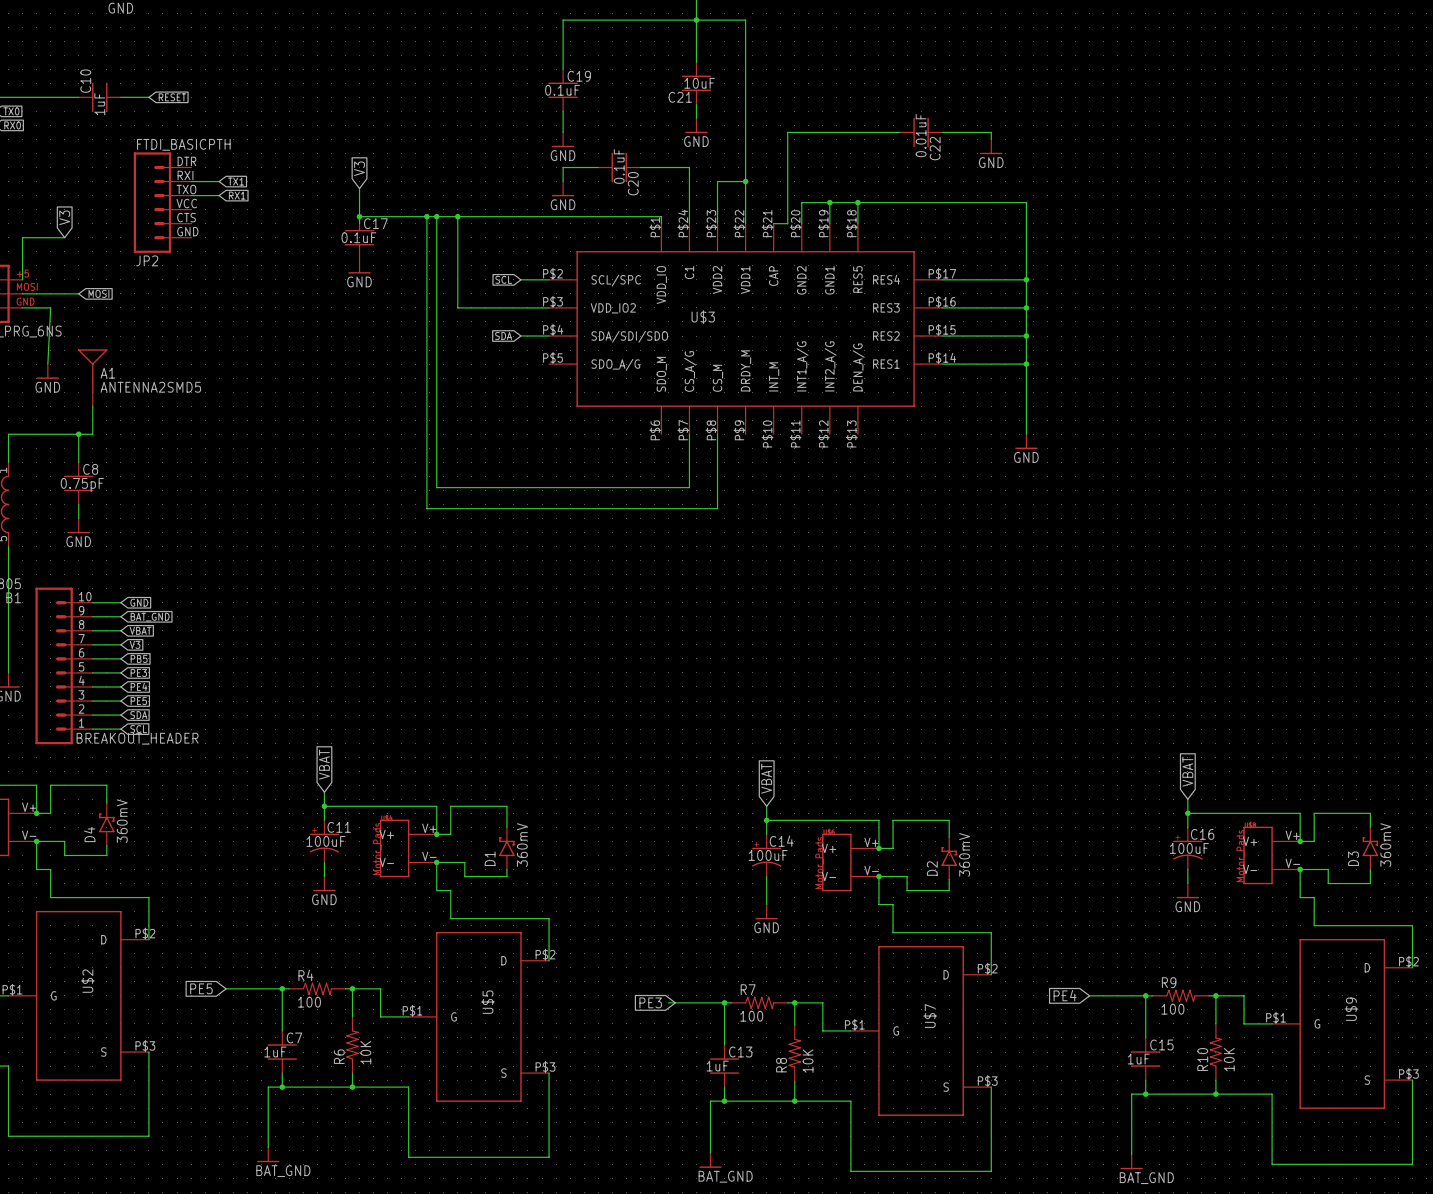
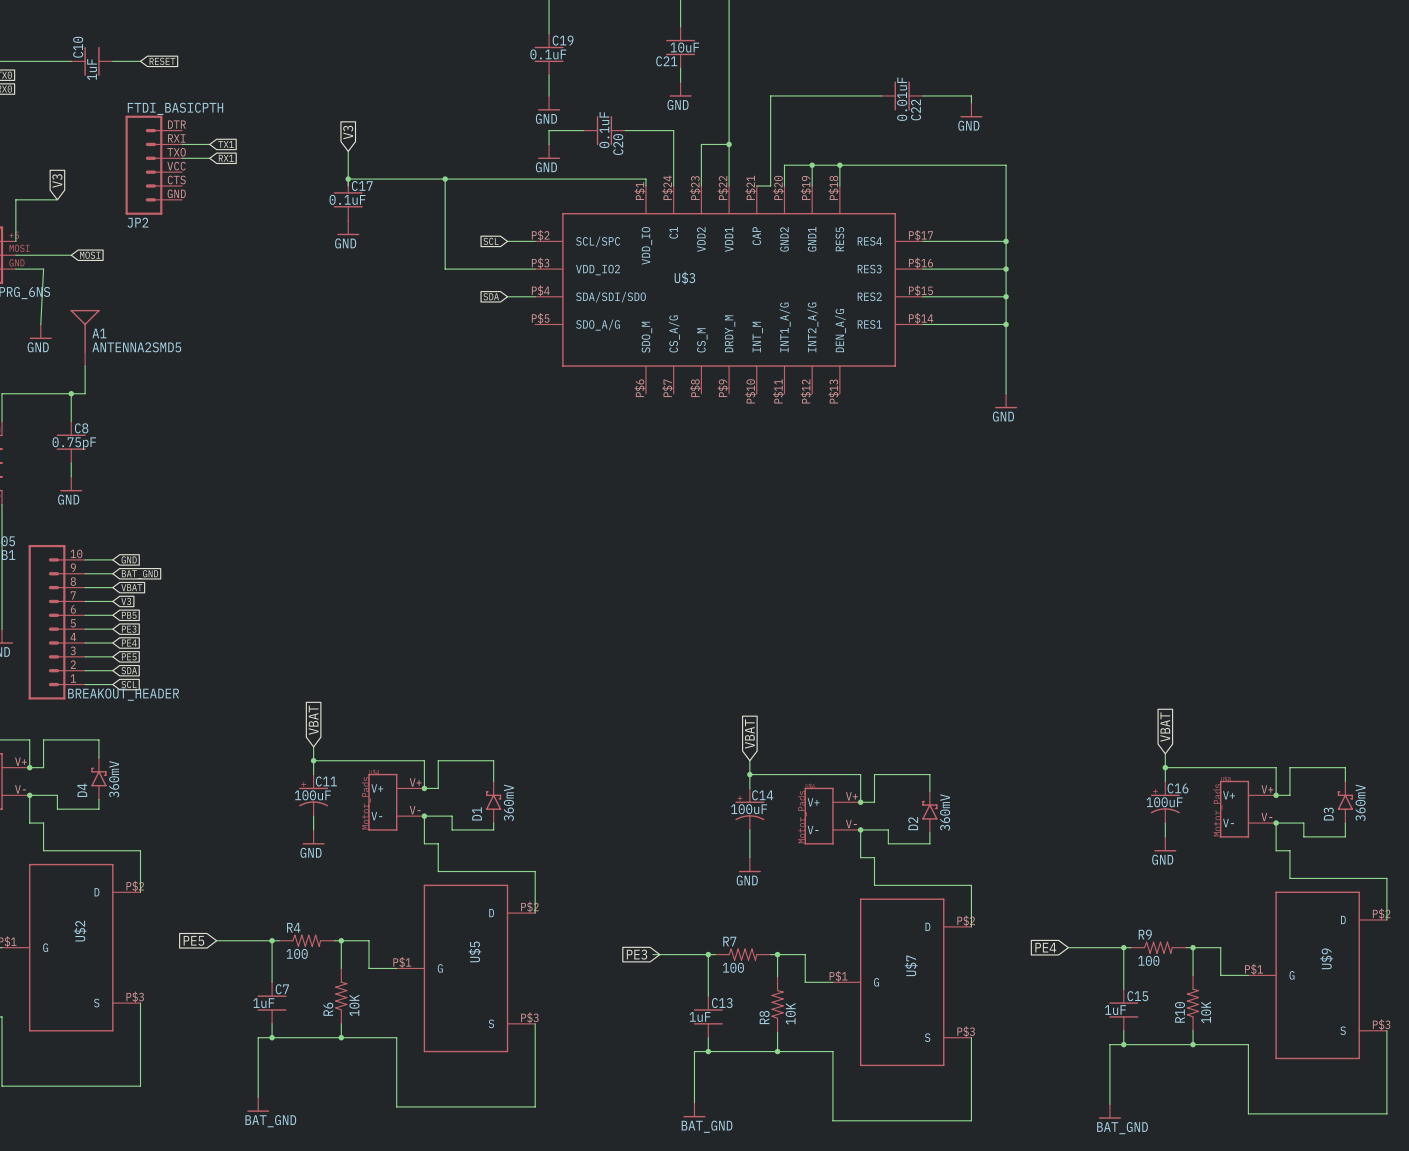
wire: (426, 216) (426, 508) (717, 508) (717, 434) -> none
junction: (426, 216) -> none
wire: (436, 216) (436, 487) (689, 487) (689, 434) -> none
junction: (436, 216) -> none

